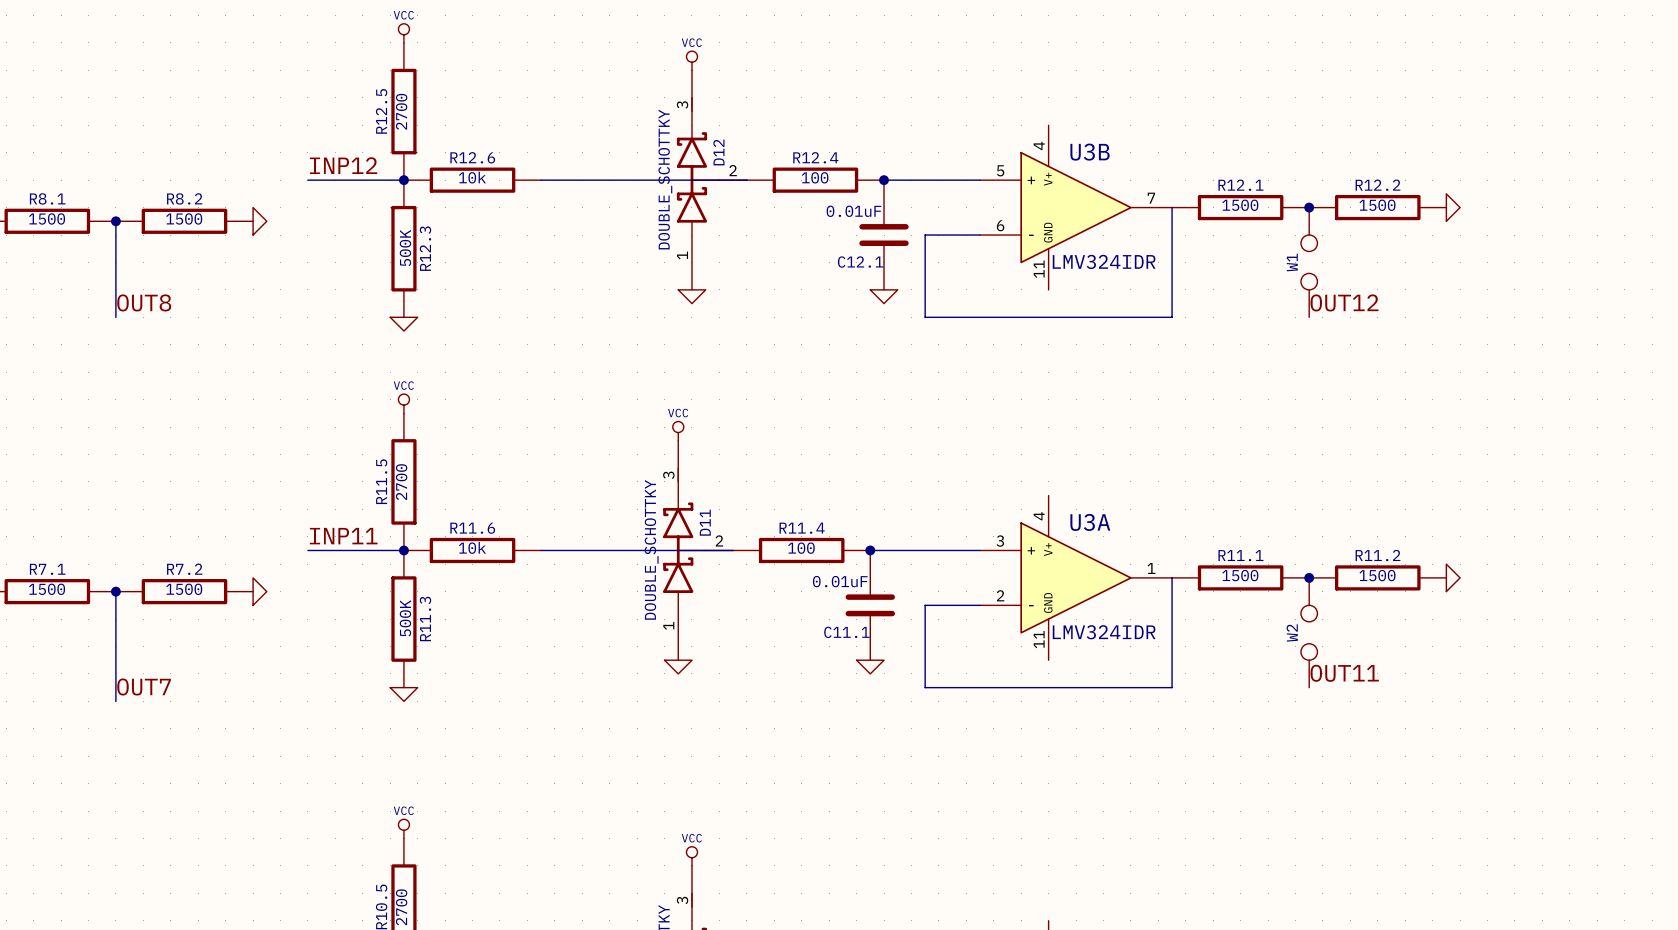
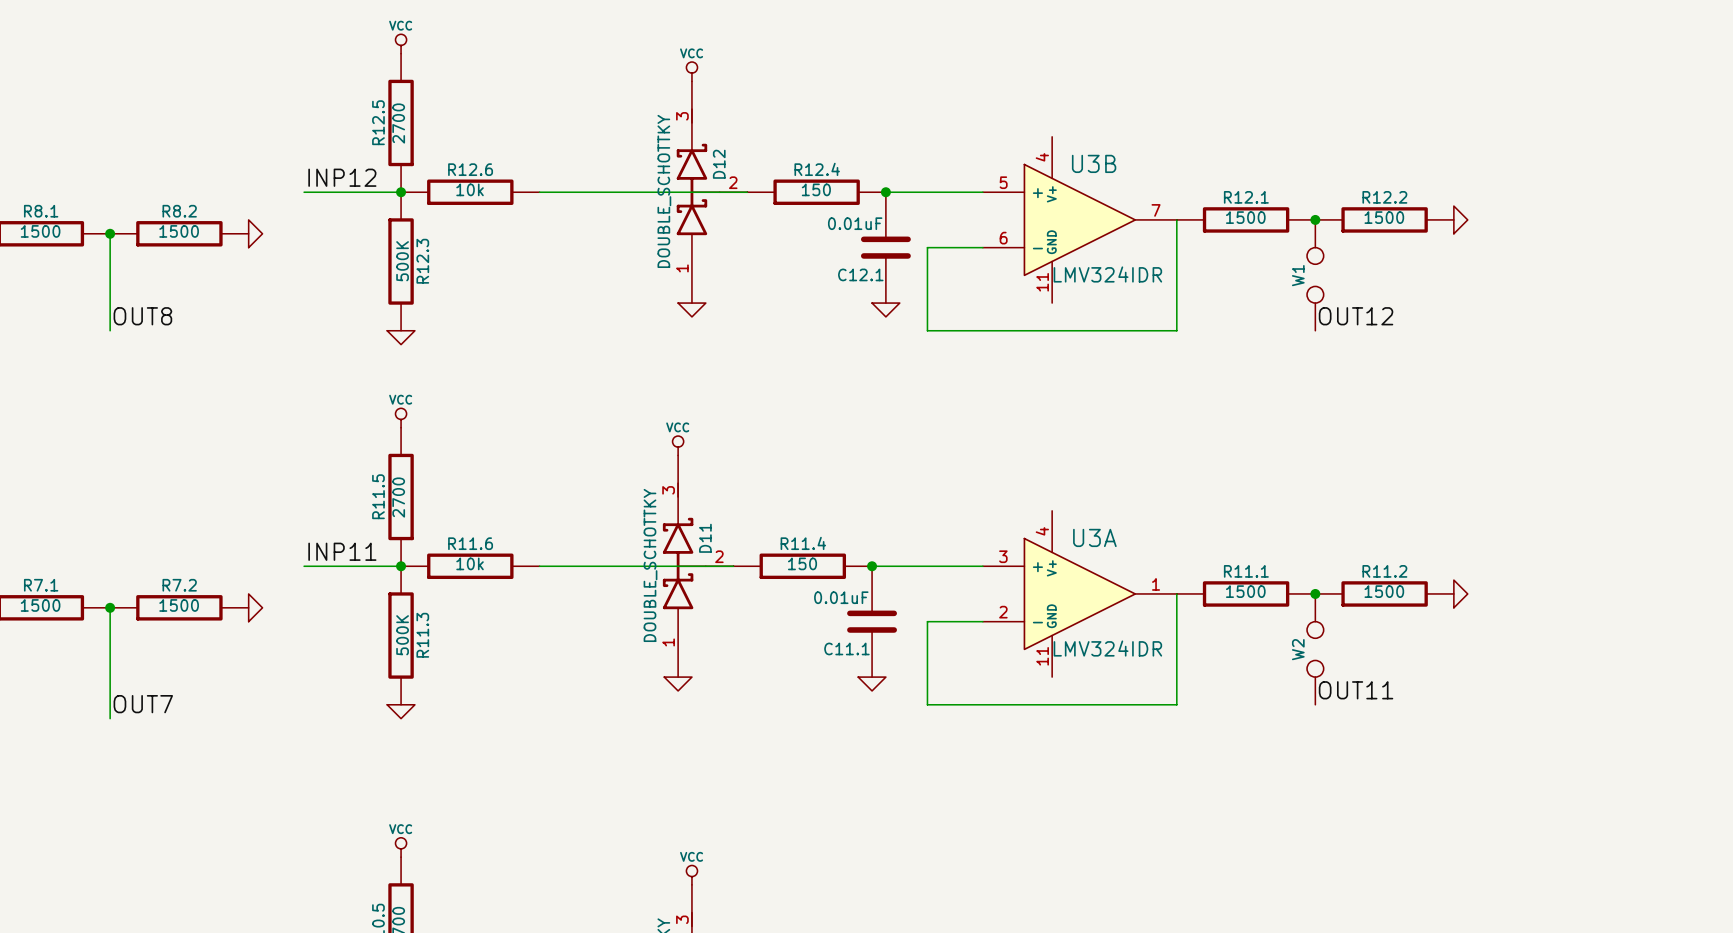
R12.4 value: 100 (815, 177) -> 150 (816, 189)
R11.4 value: 100 (801, 548) -> 150 (802, 563)

